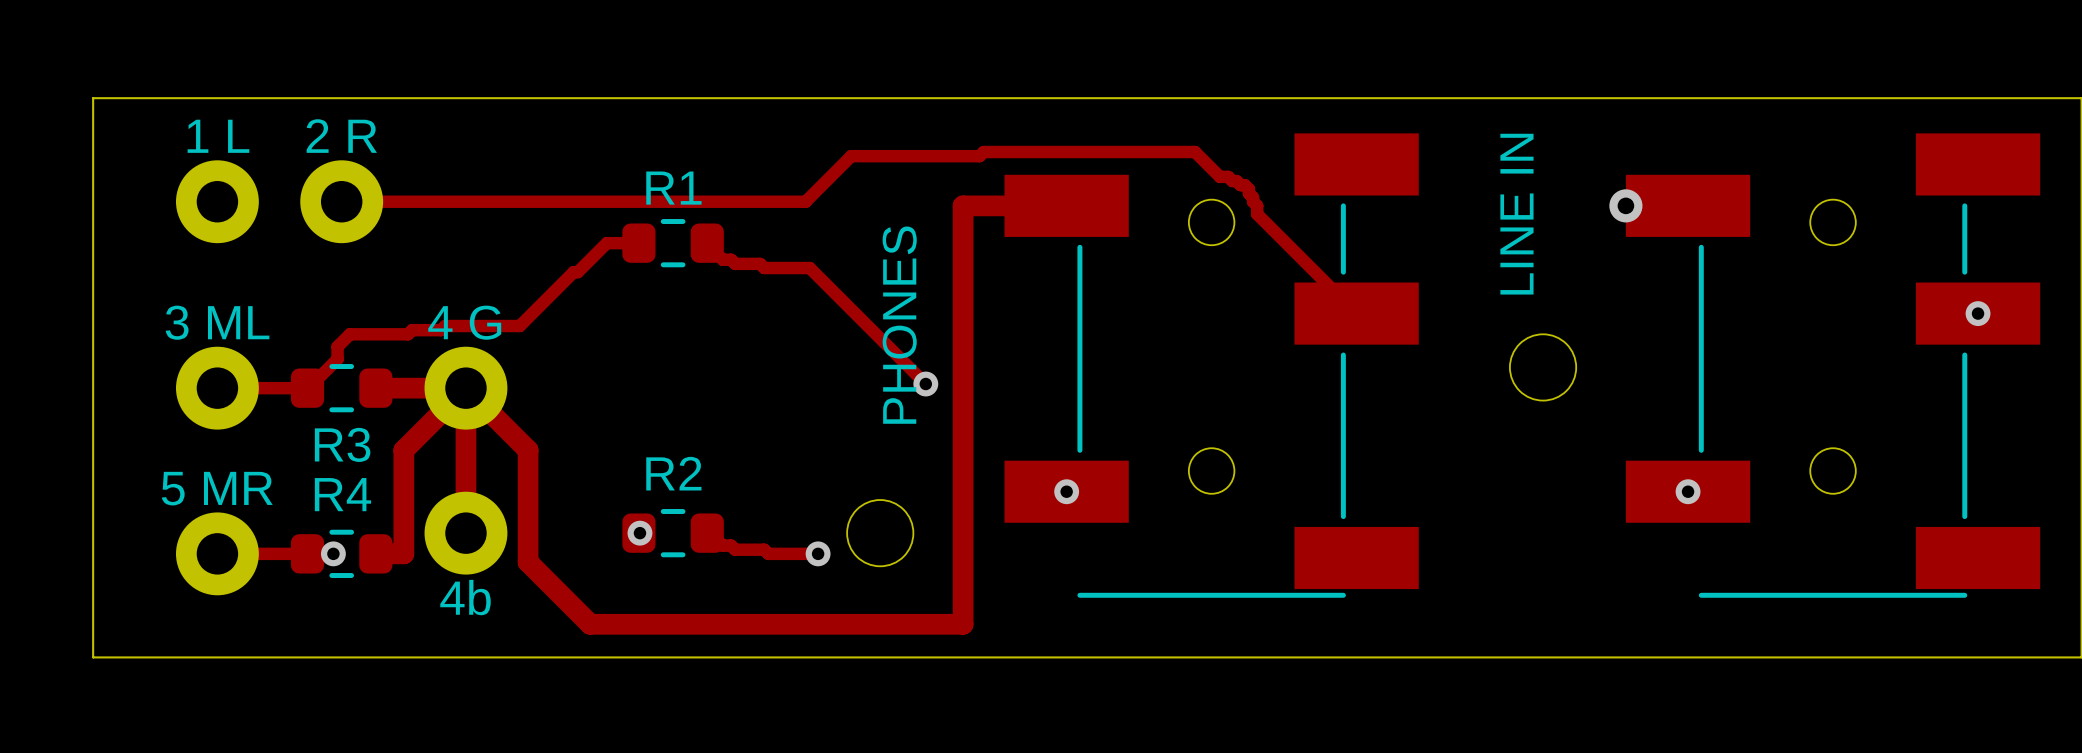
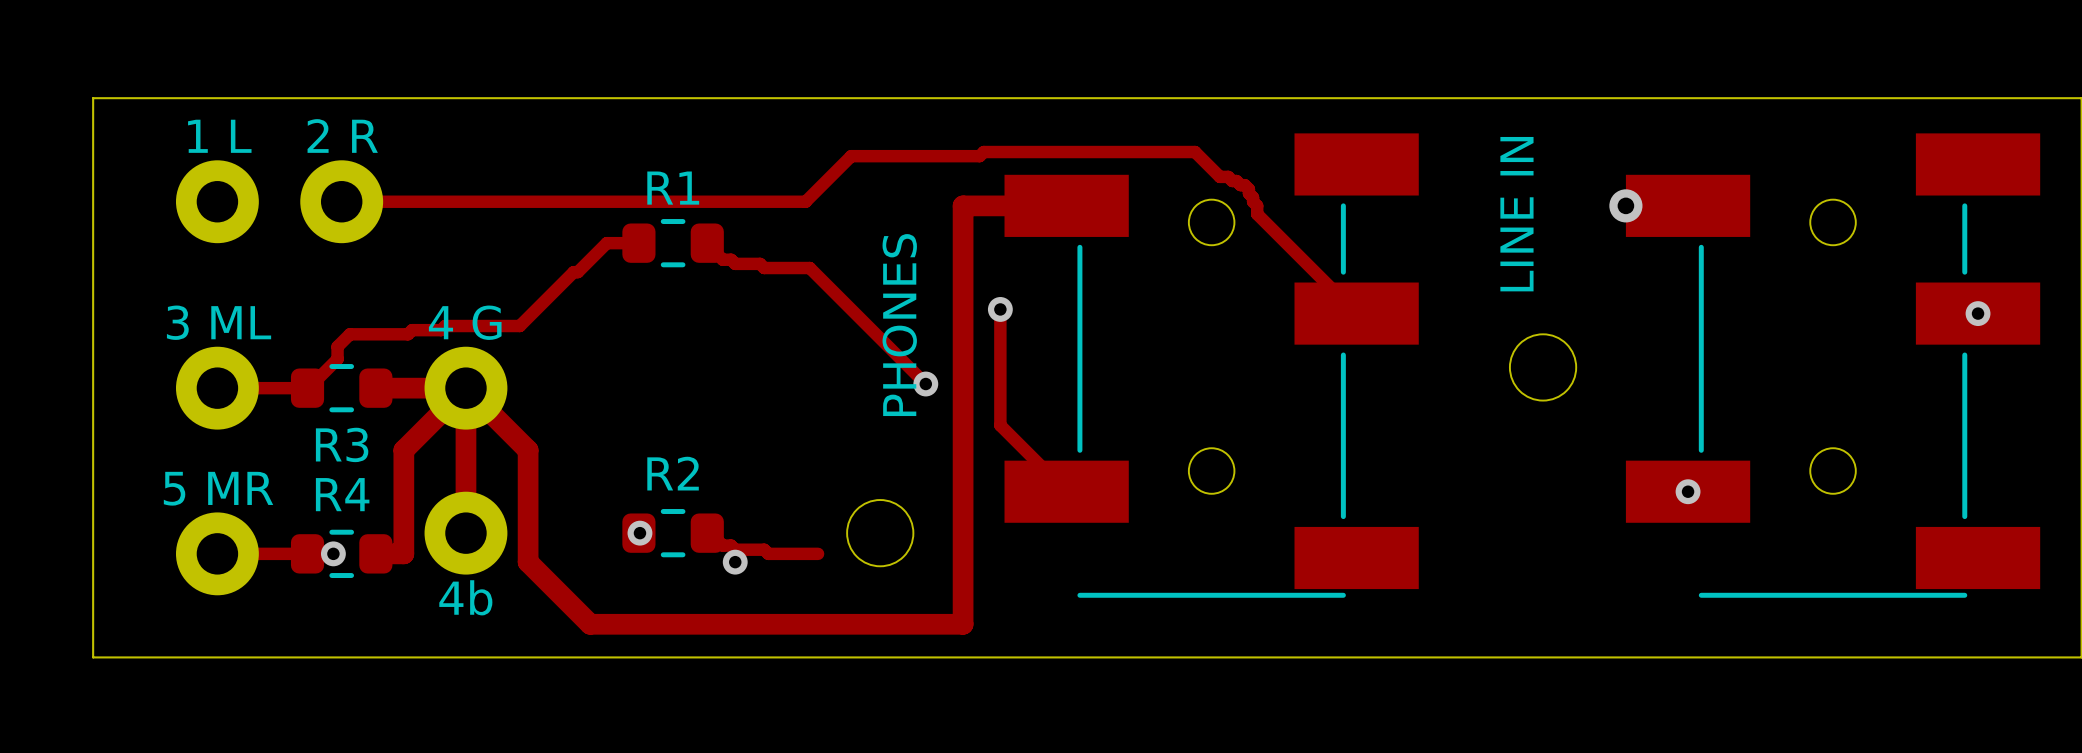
track: none -> (1000, 309) (1000, 425) (1066, 491)
via: none -> (1000, 309)
via: (1066, 491) -> none
via position: (818, 553) -> (735, 562)

